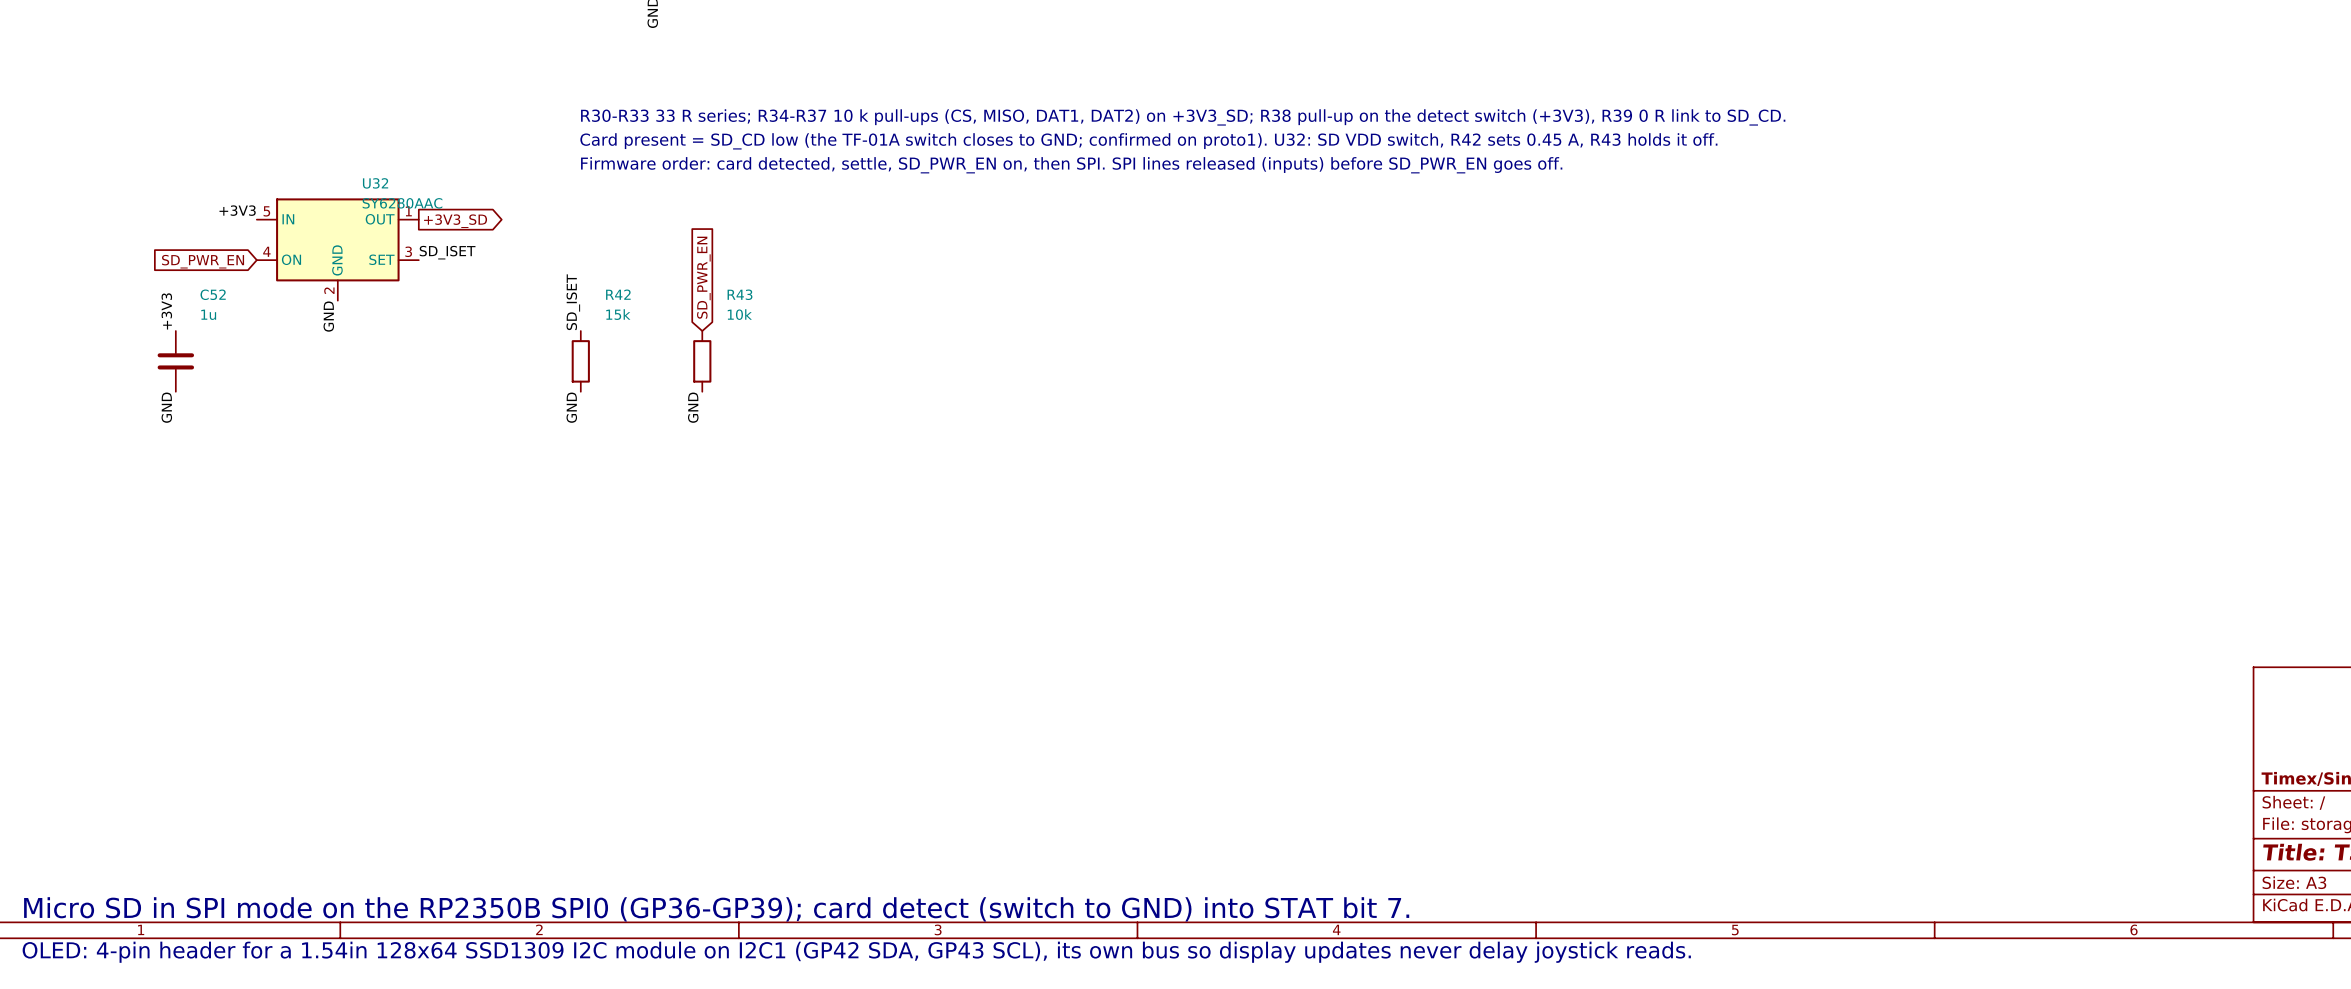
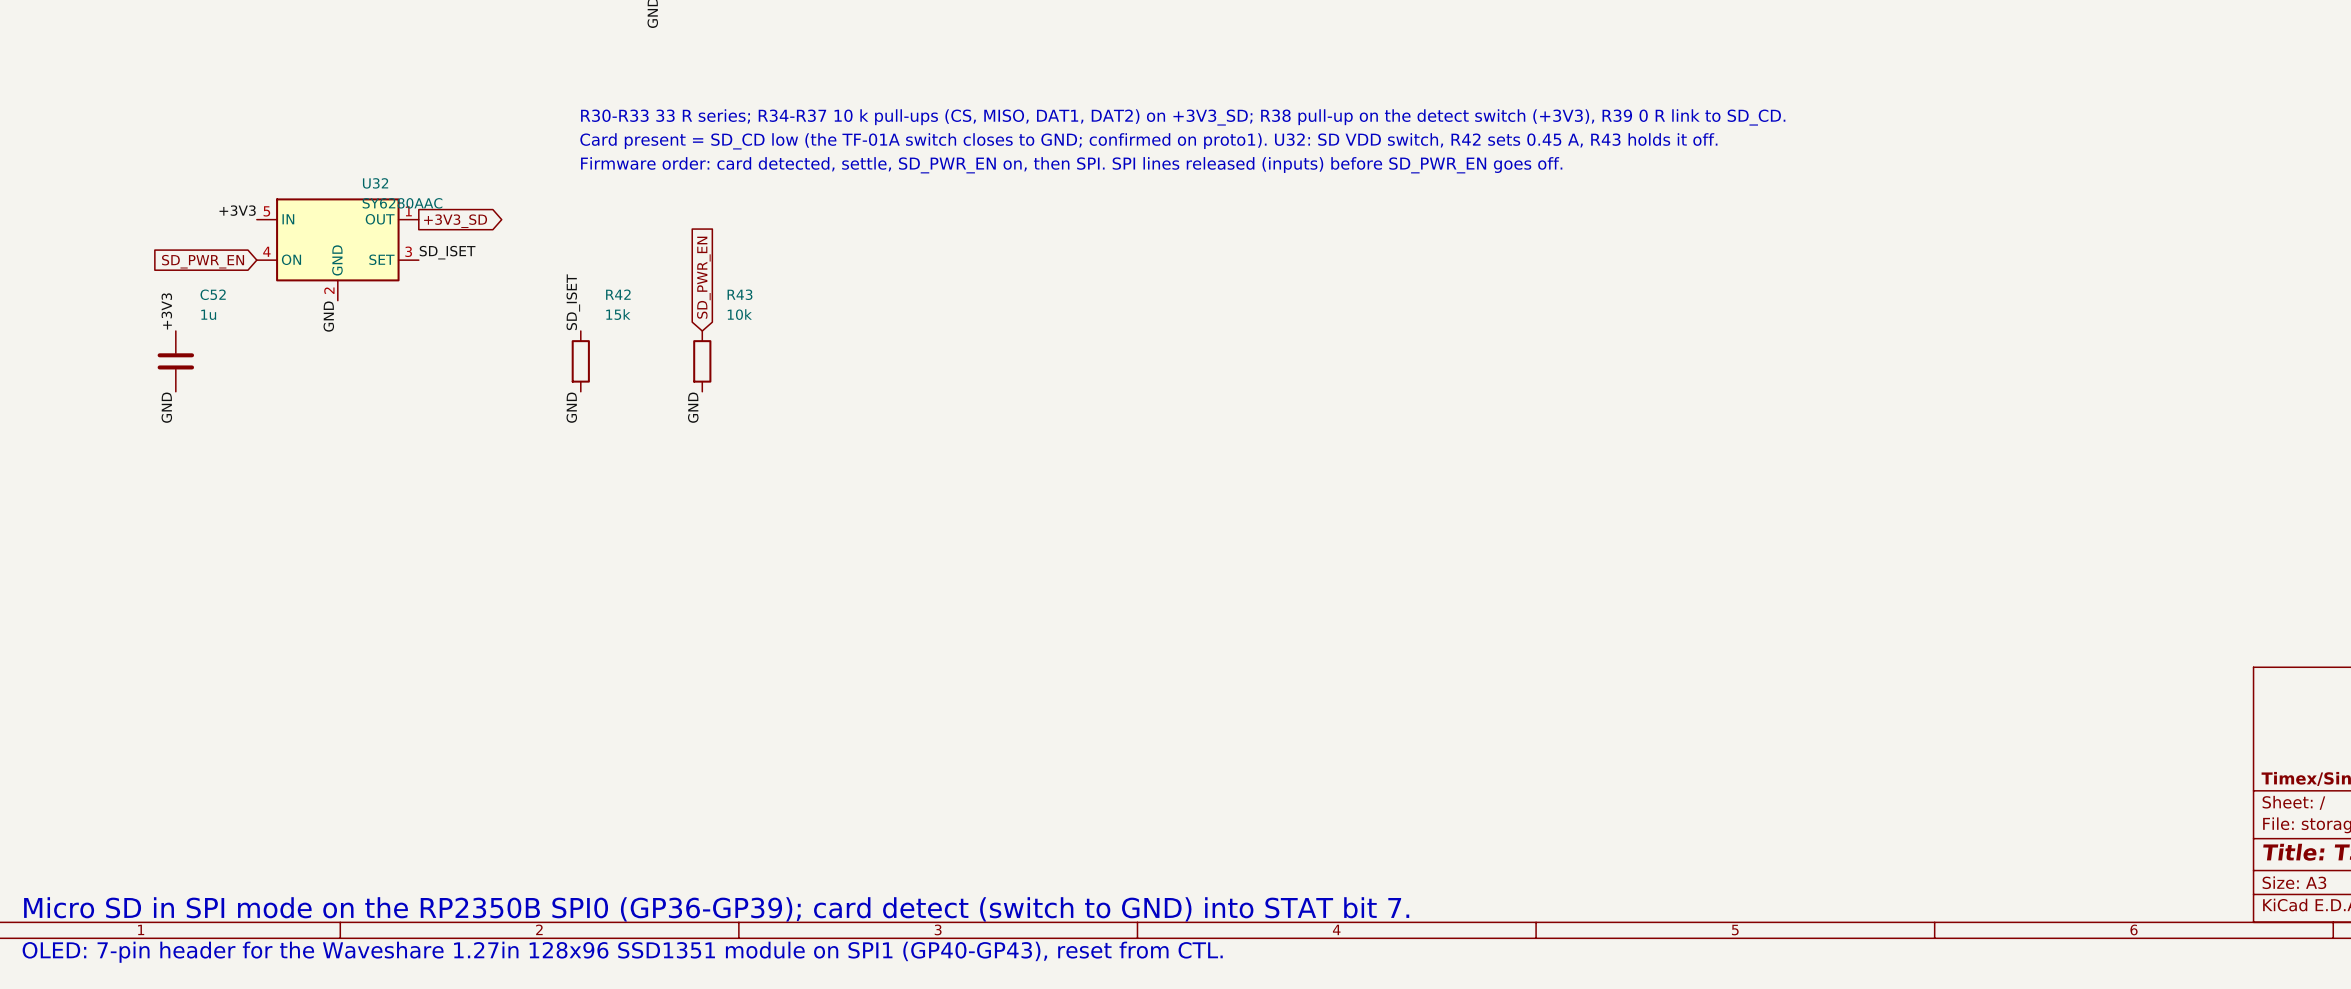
text: OLED: 4-pin header for a 1.54in 128x64 SSD1309 I2C module on I2C1 (GP42 SDA, GP43 SCL), its own bus so display updates never delay joystick reads. (856, 952) -> OLED: 7-pin header for the Waveshare 1.27in 128x96 SSD1351 module on SPI1 (GP40-GP43), reset from CTL. (622, 952)

